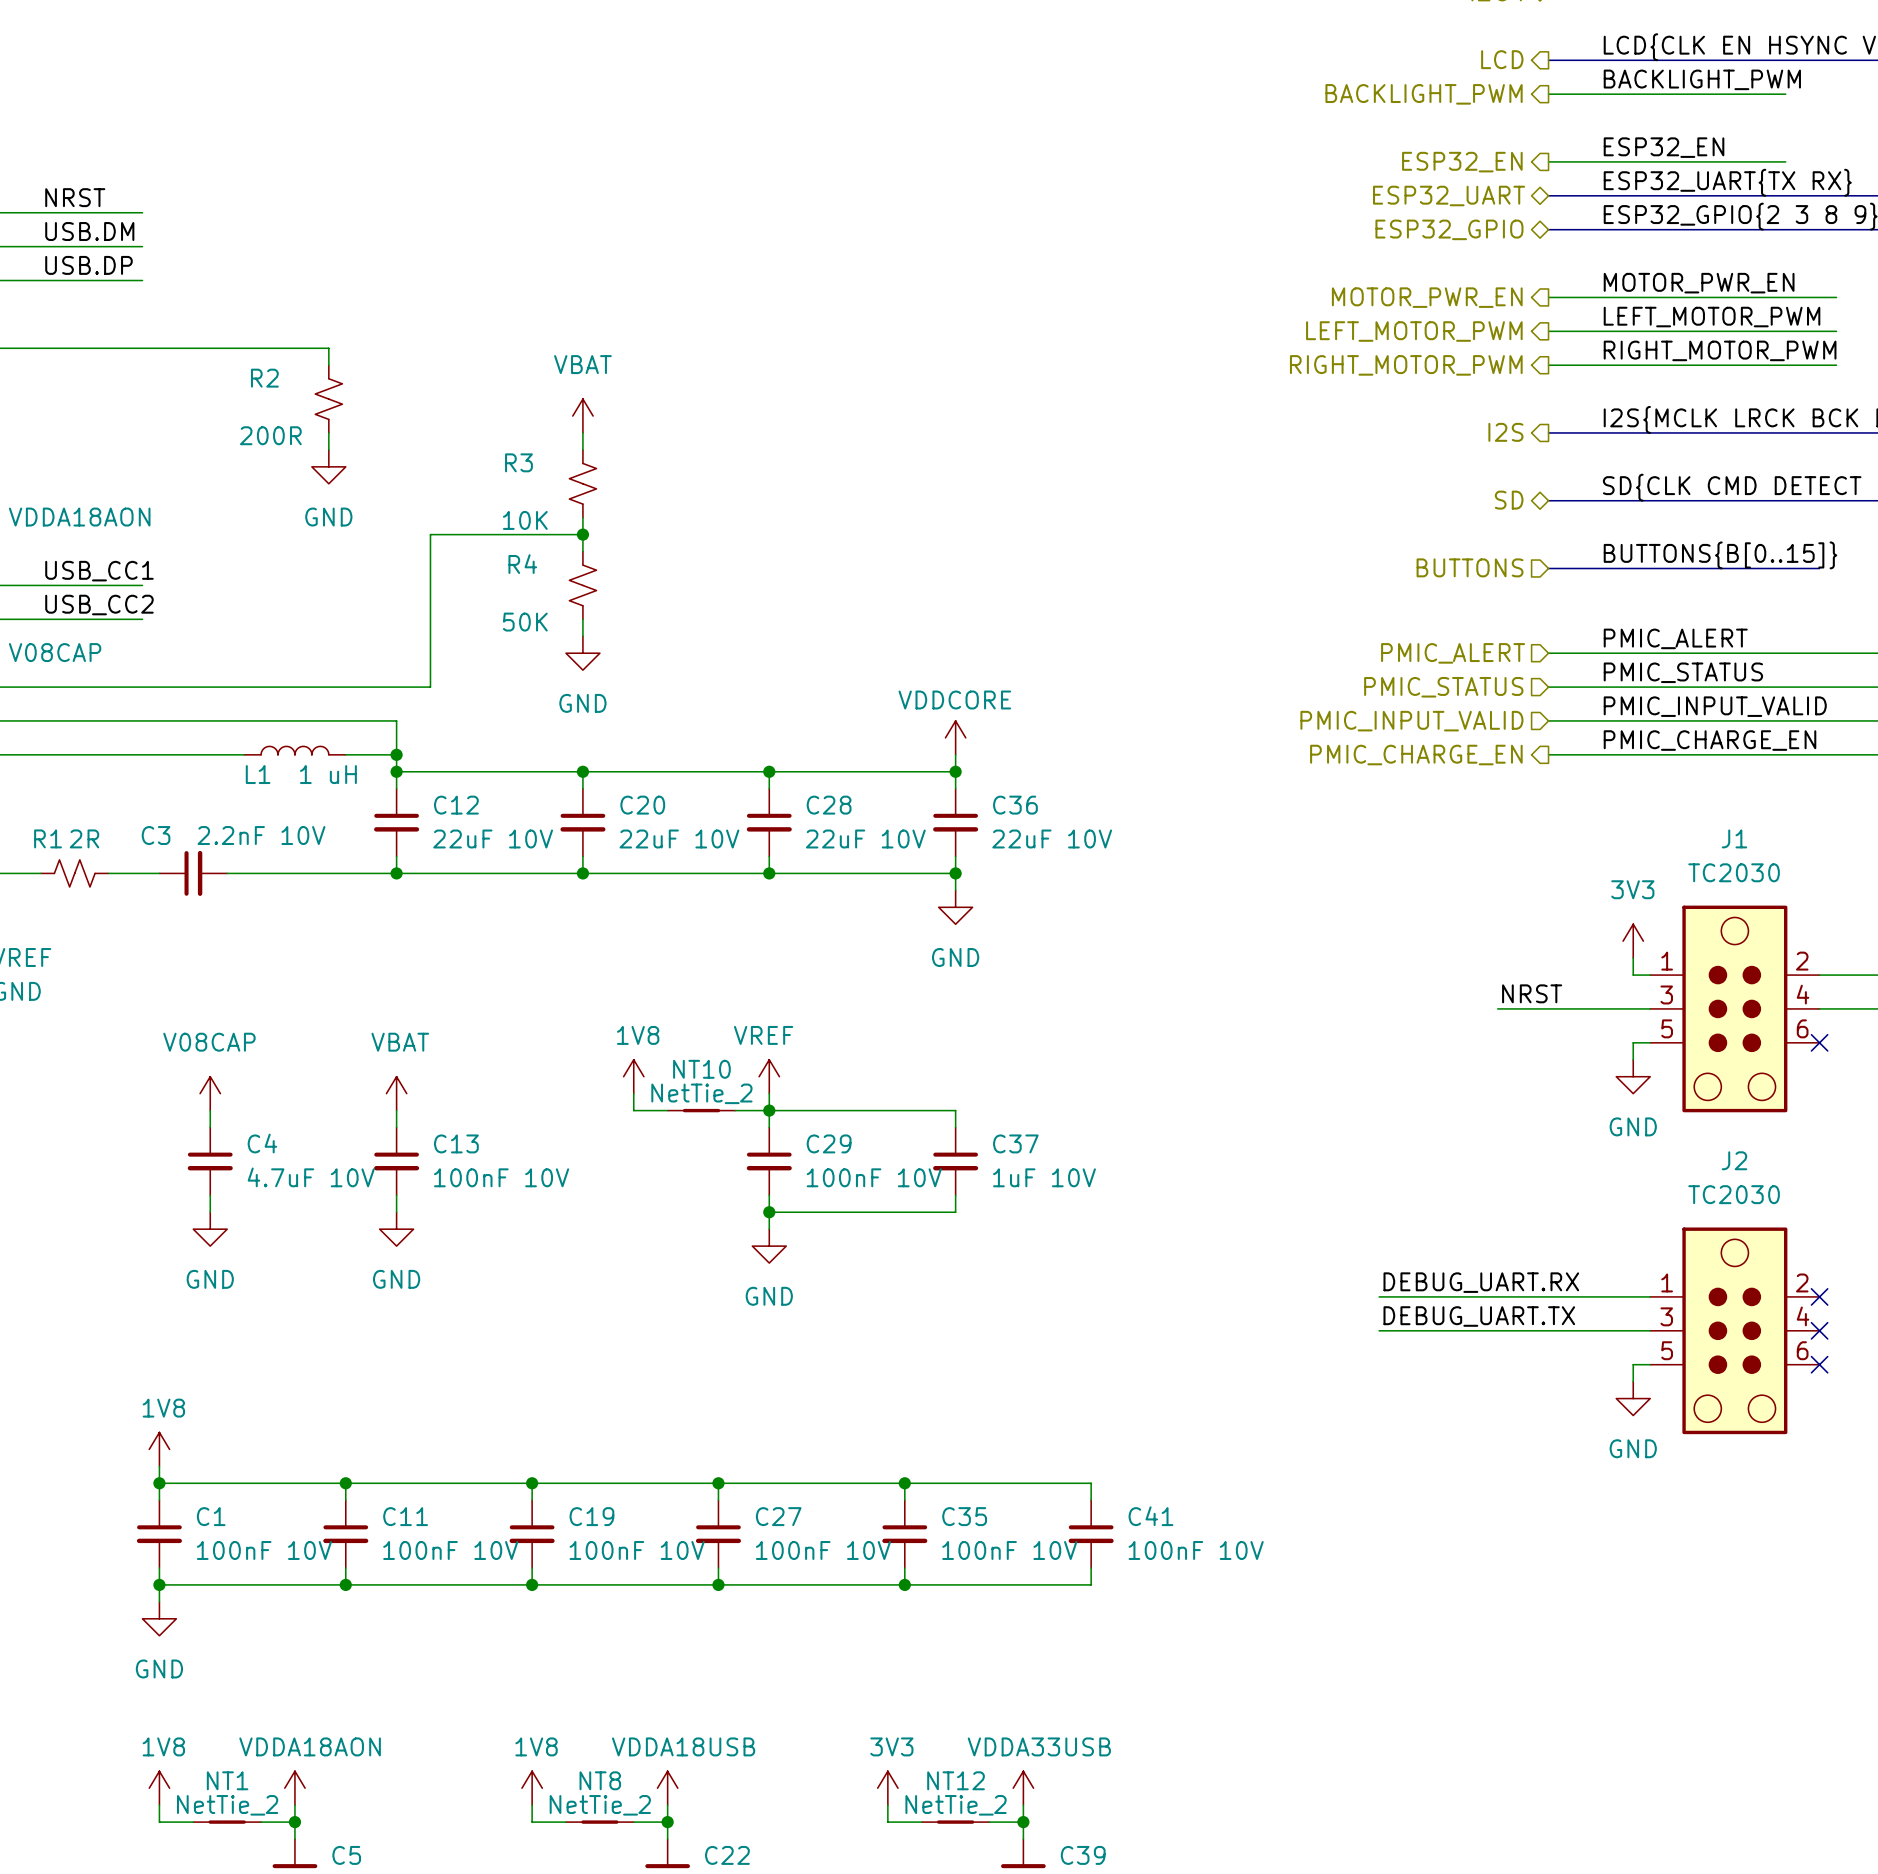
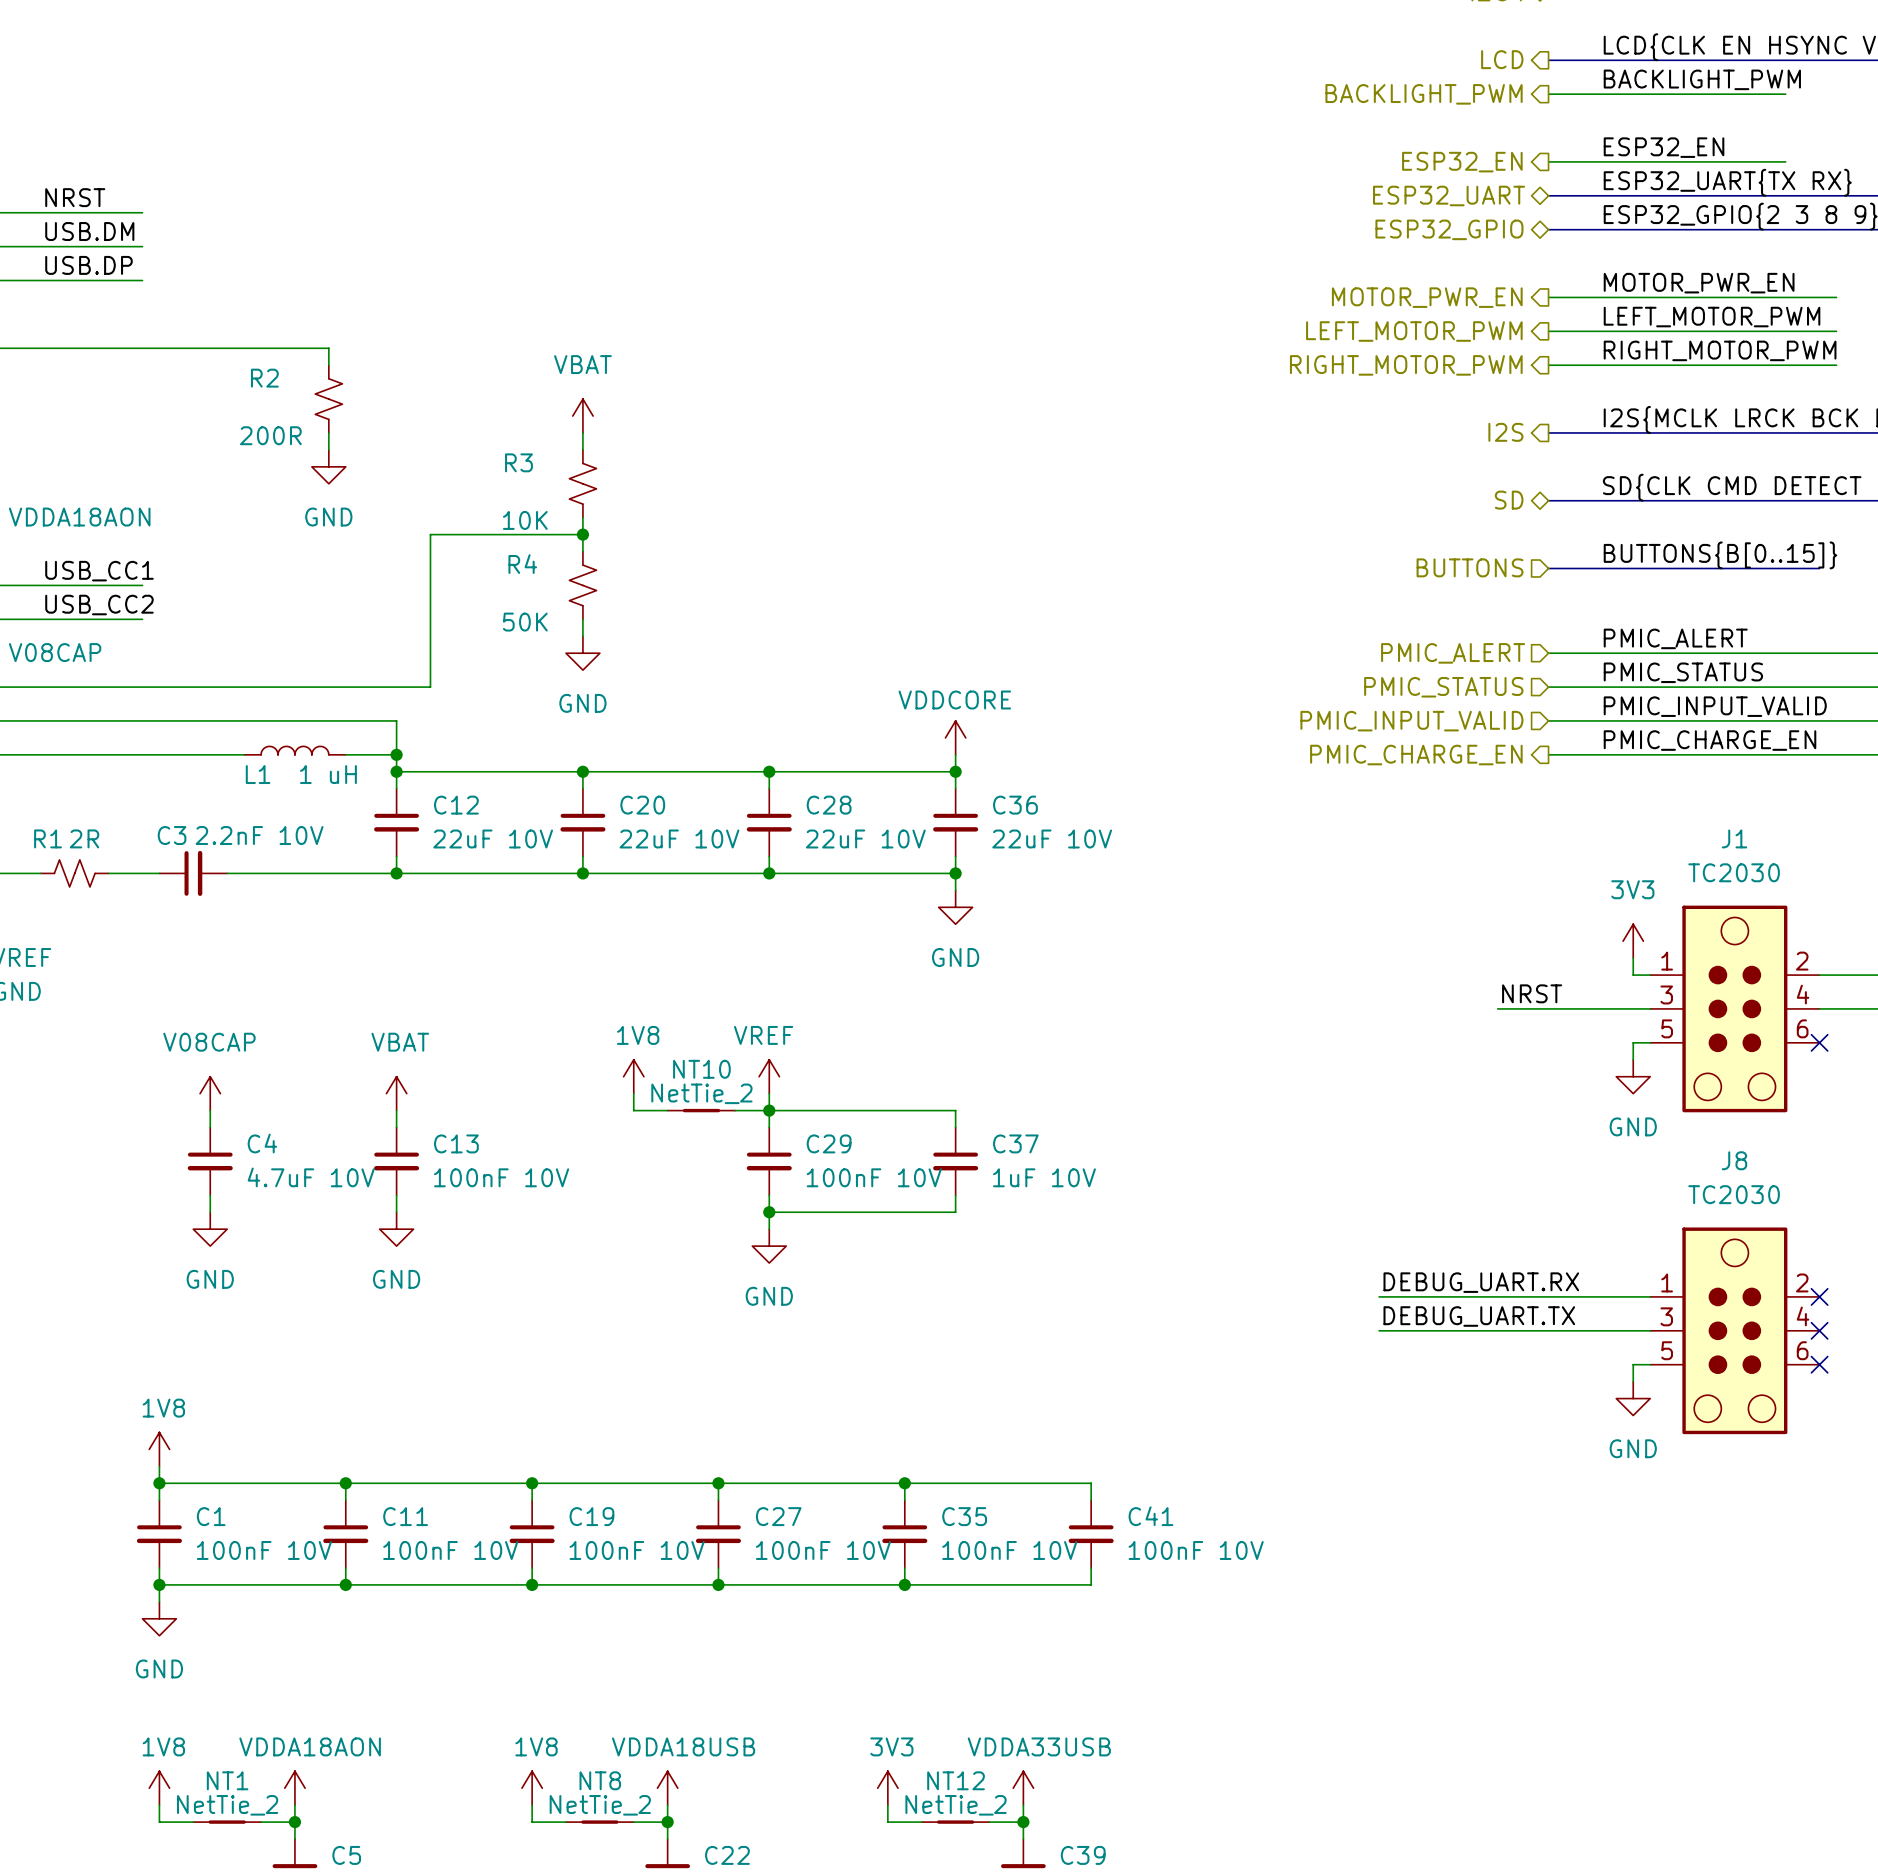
C3 name position: C3 (156, 835) -> C3 (172, 835)
C3 value position: 2.2nF 10V (261, 835) -> 2.2nF 10V (259, 835)
J2 name: J2 (1734, 1160) -> J8 (1734, 1160)

